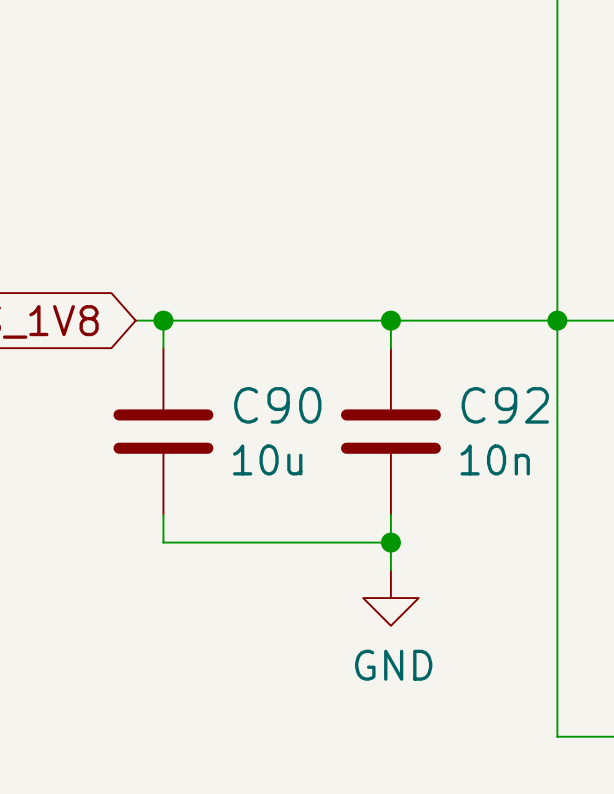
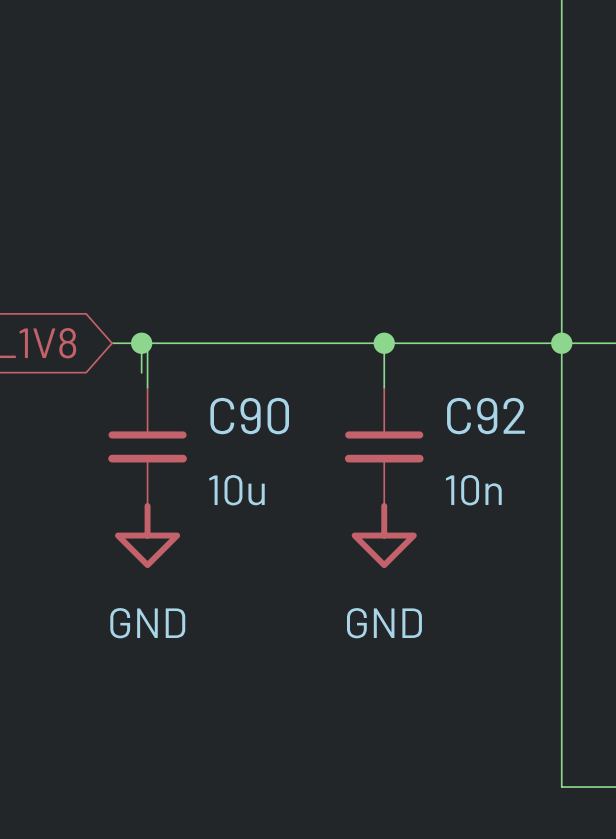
wire: none -> (147, 343) (147, 387)
C90 symbol: [113, 348, 214, 515] -> [108, 387, 187, 506]
C92 symbol: [340, 348, 441, 515] -> [344, 387, 424, 506]
power symbol: none -> GND (147, 535)
power symbol: none -> GND (384, 535)
wire: (163, 514) (163, 542) (390, 542) -> none
wire: (390, 514) (390, 570) -> none
junction: (390, 542) -> none
power symbol: GND (390, 598) -> none

